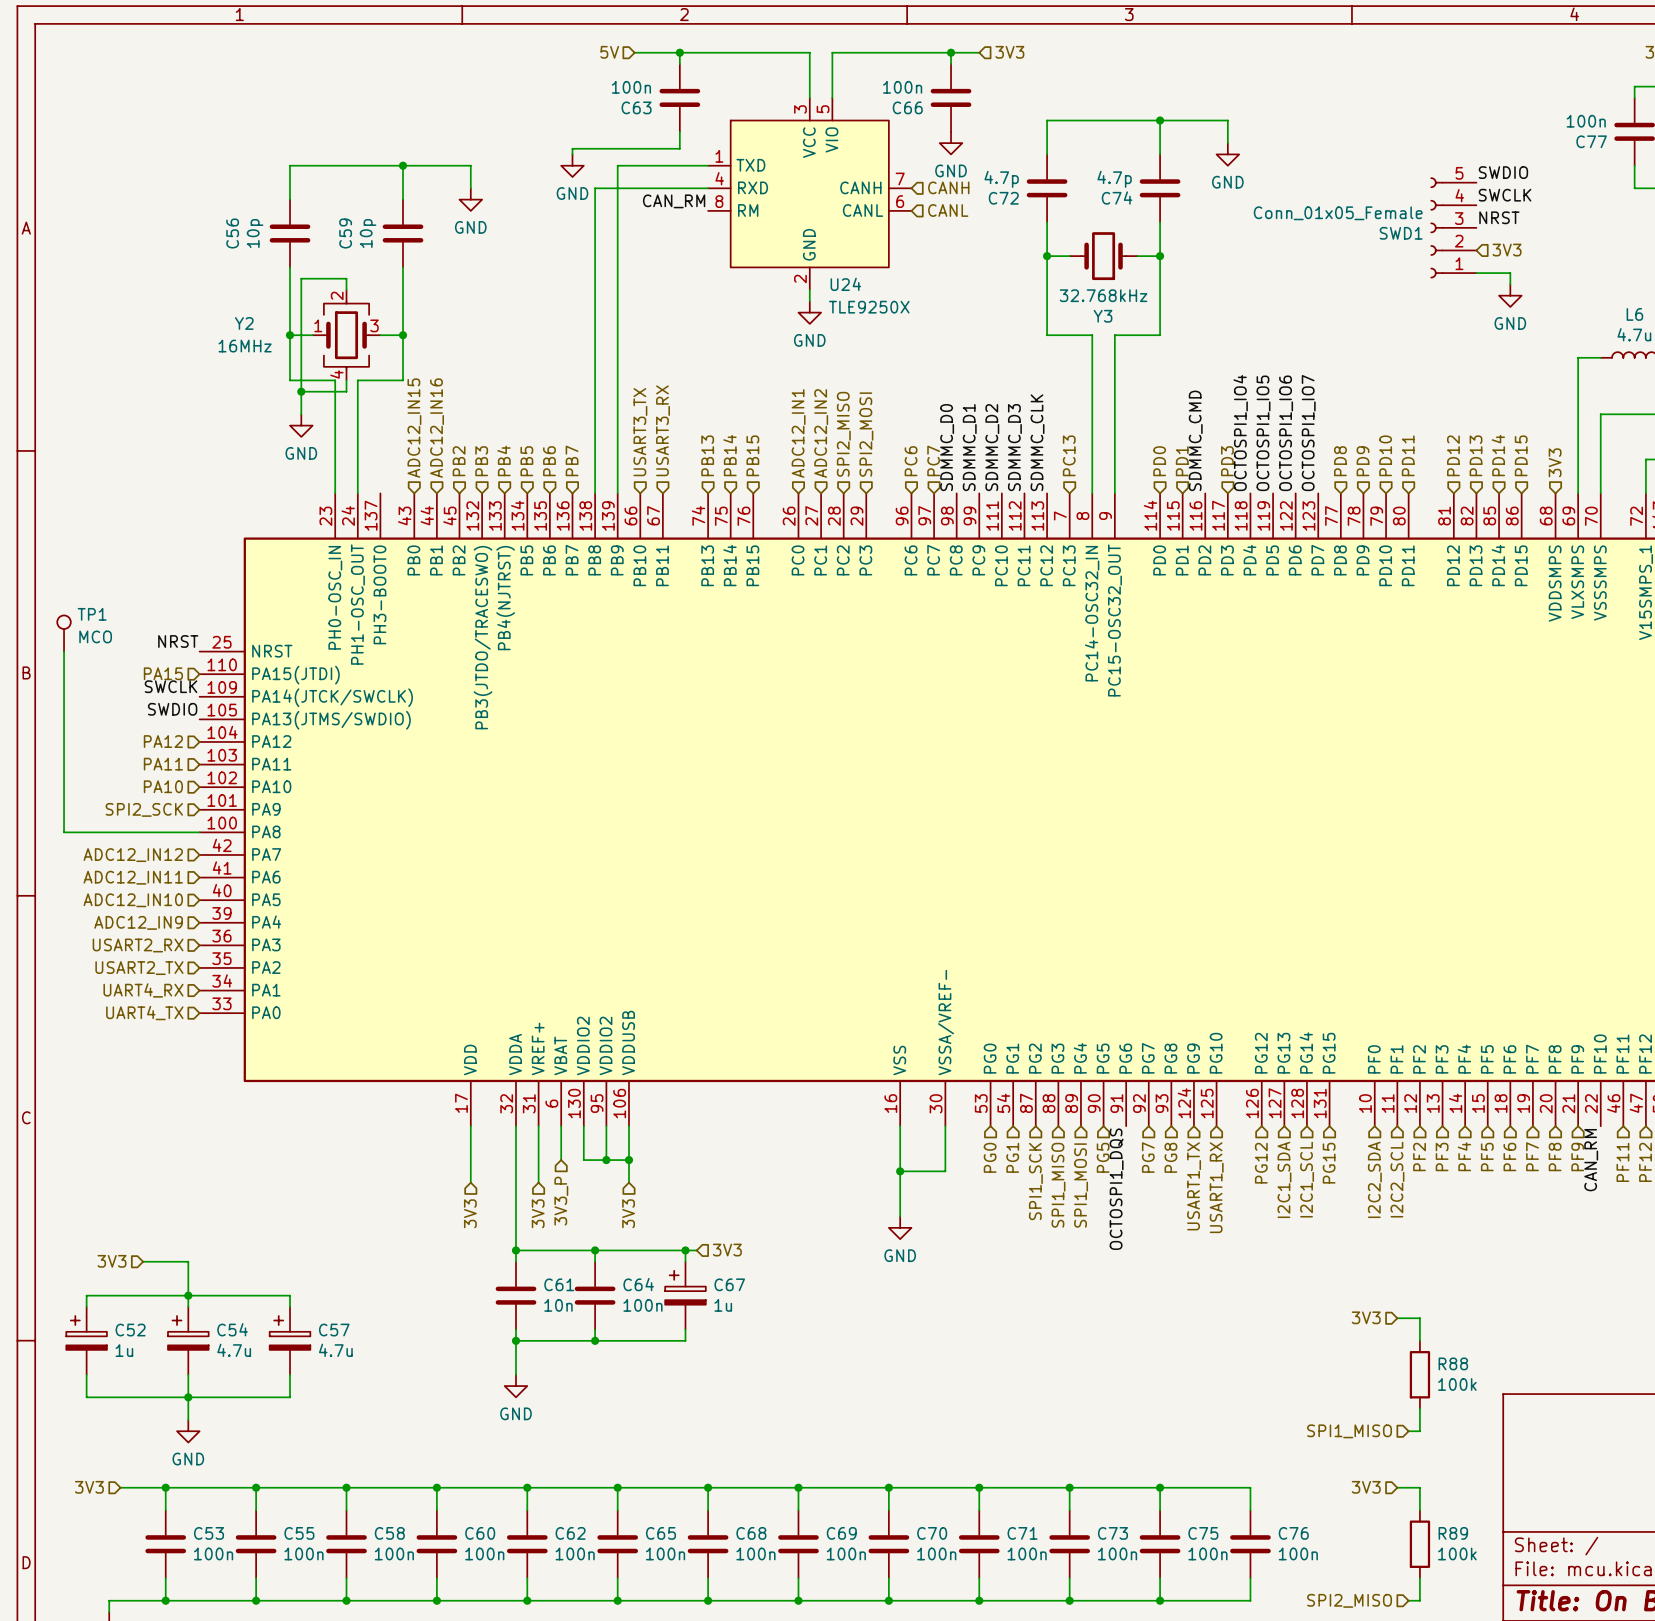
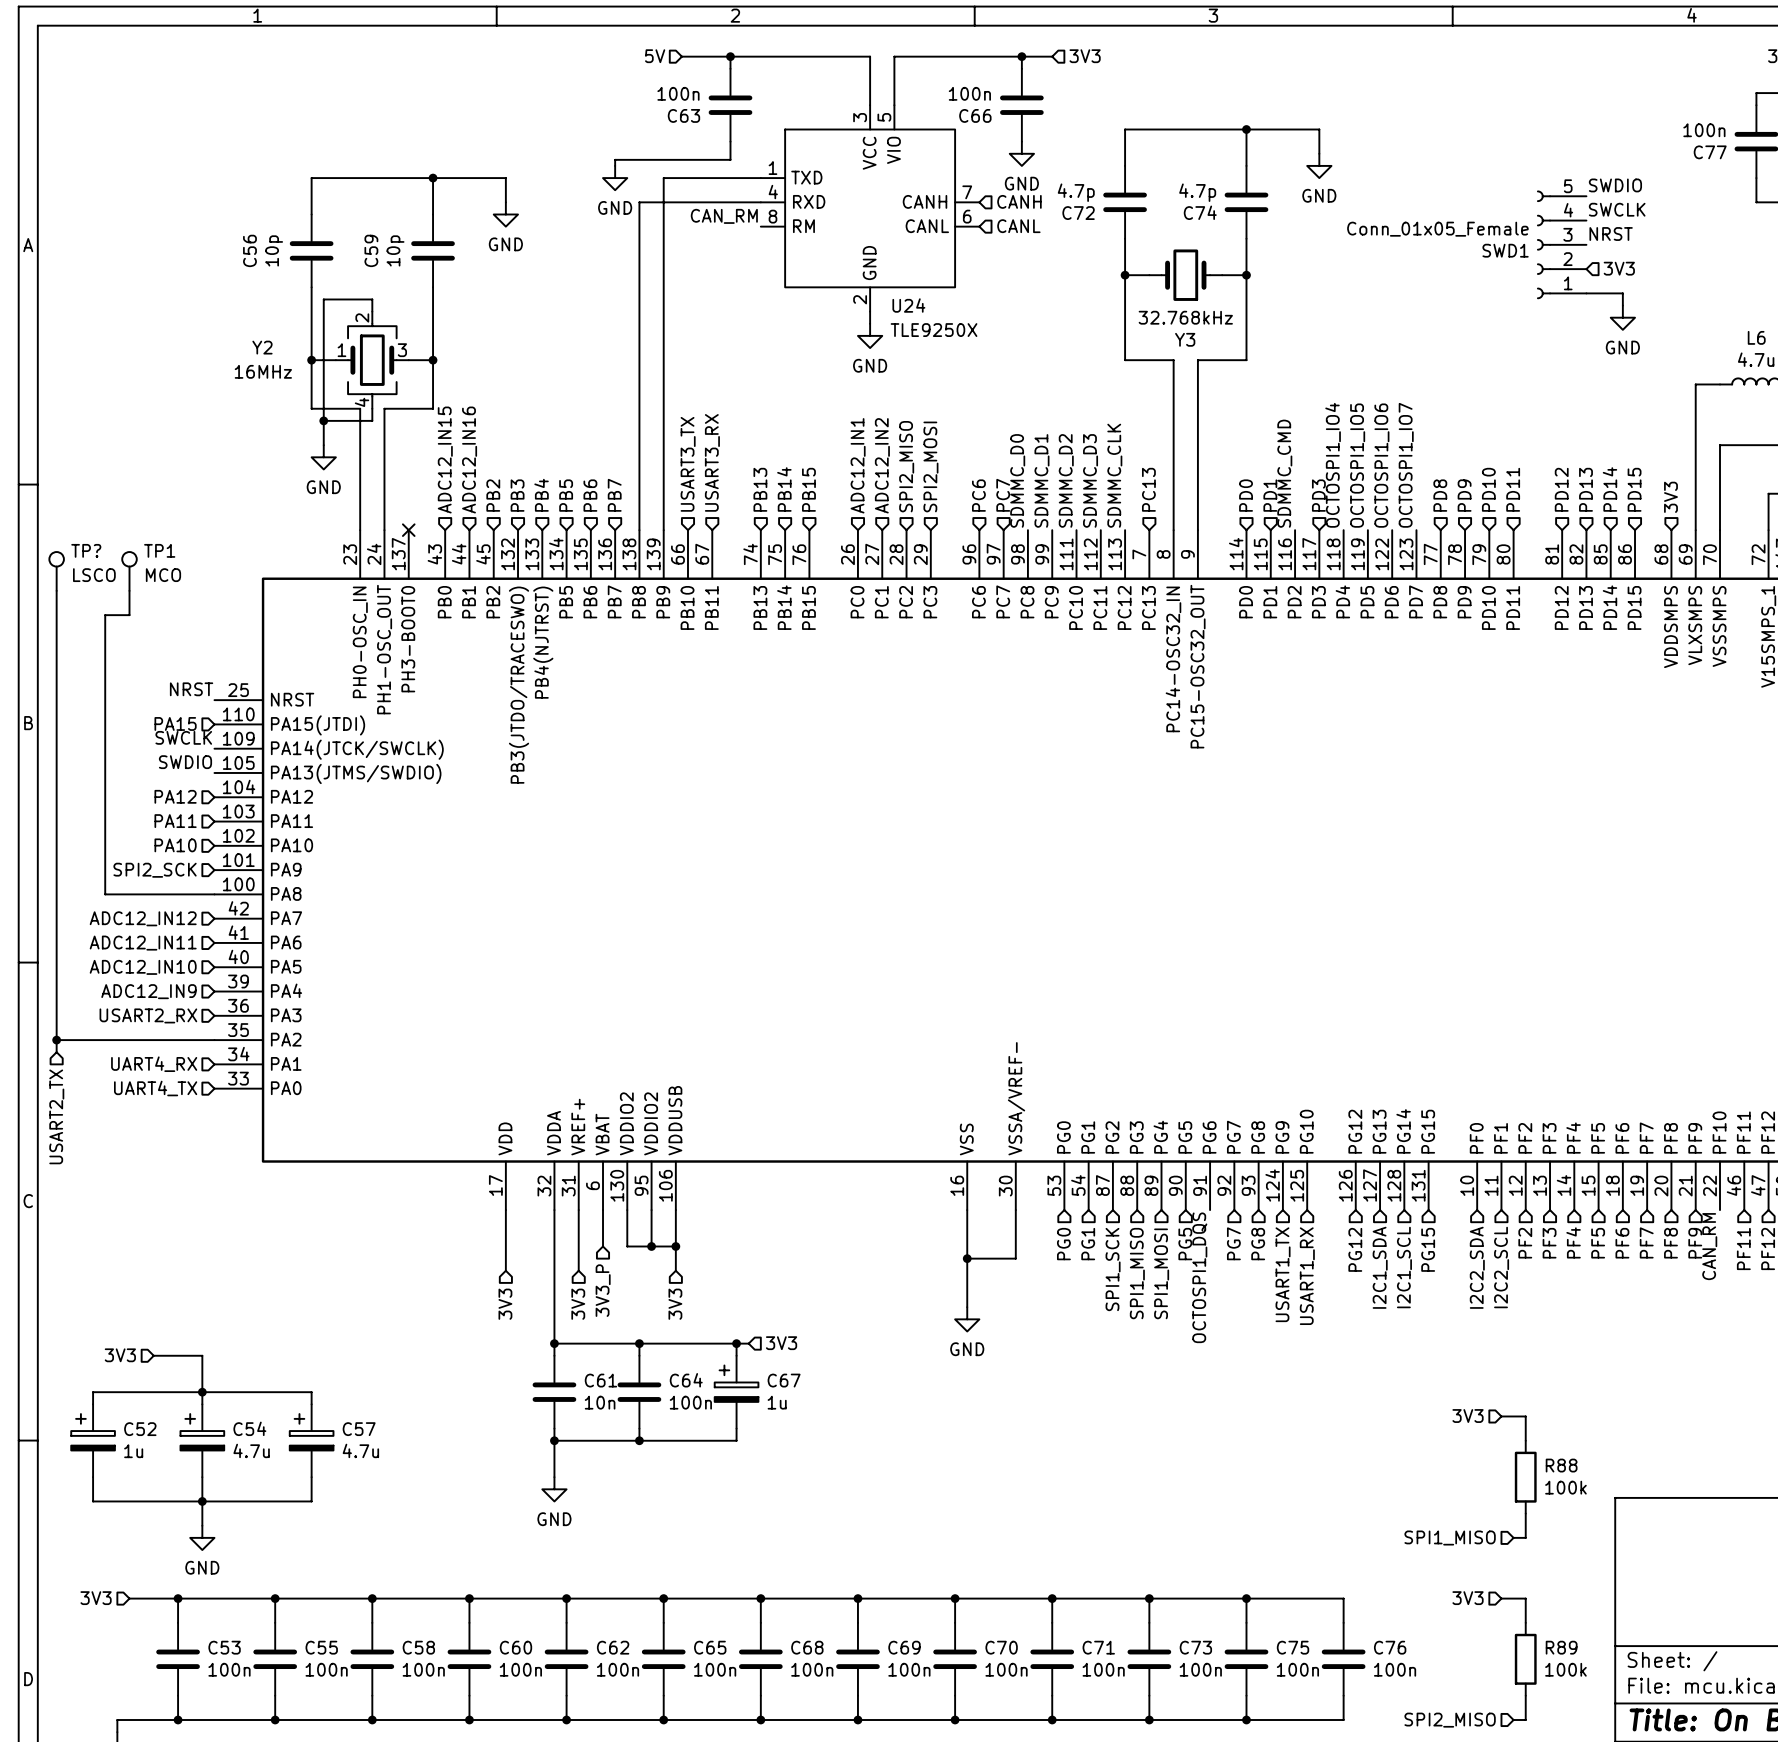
no-connect mark: none -> (408, 530)
TP?: none -> LSCO (56, 571)
wire: none -> (56, 590) (56, 1052)
TP1 position: (64, 633) -> (129, 571)
wire: (64, 651) (64, 832) (97, 832) -> (129, 590) (129, 615) (105, 615) (105, 894)
wire: none -> (56, 1040) (214, 1040)
junction: none -> (56, 1040)
hierarchical label rotation: 0° (139, 968) -> 90° counterclockwise (56, 1116)
hierarchical label position: USART2_TX (139, 968) -> USART2_TX (56, 1116)

